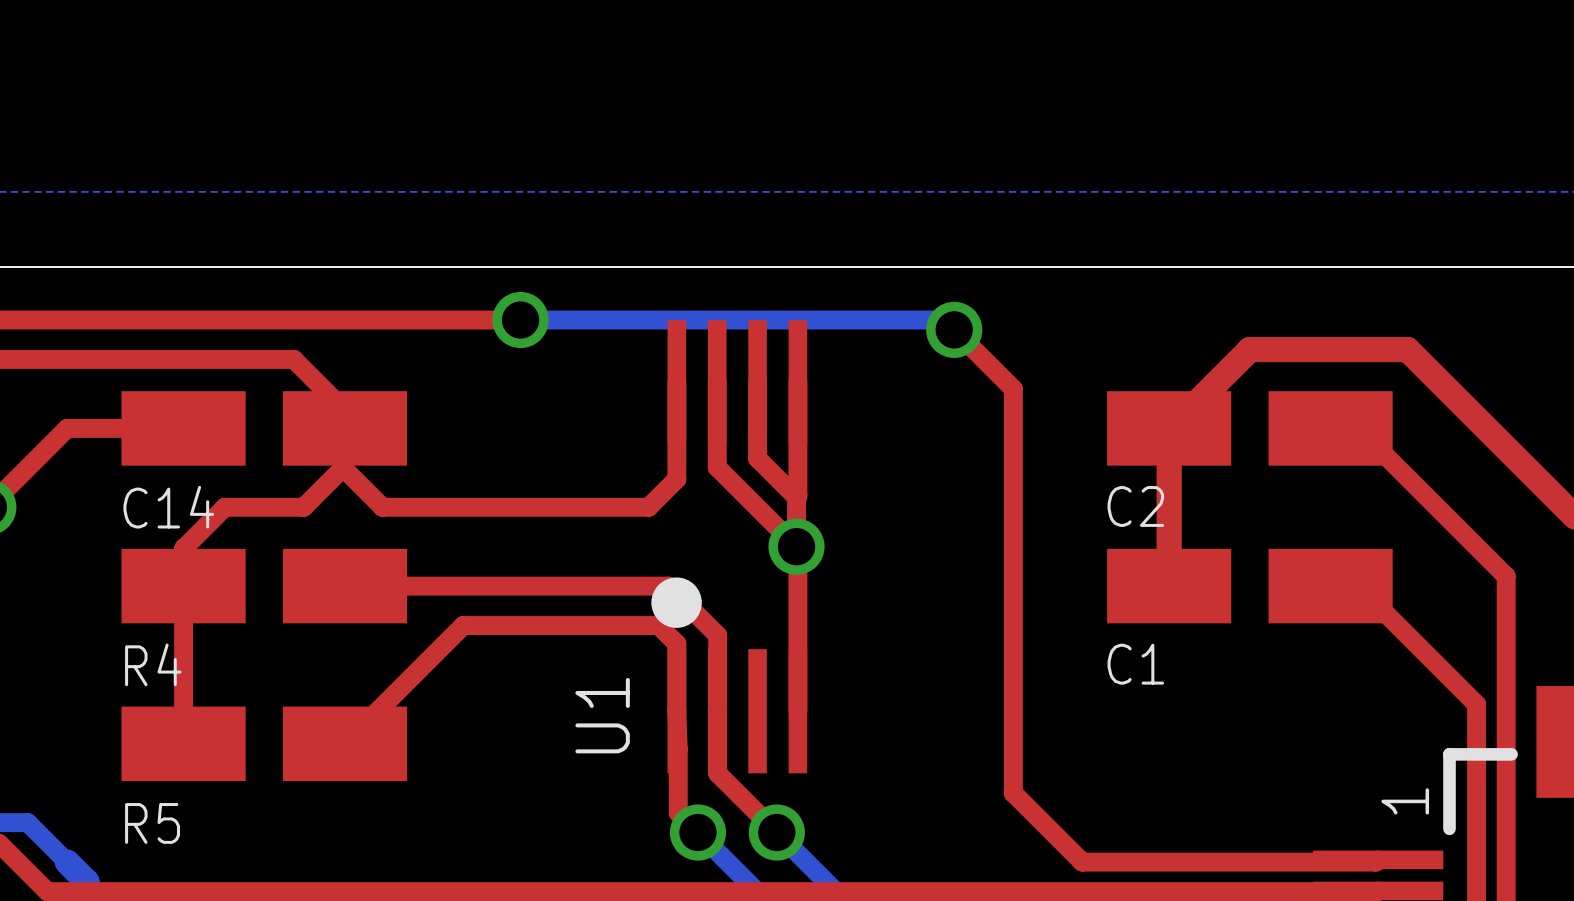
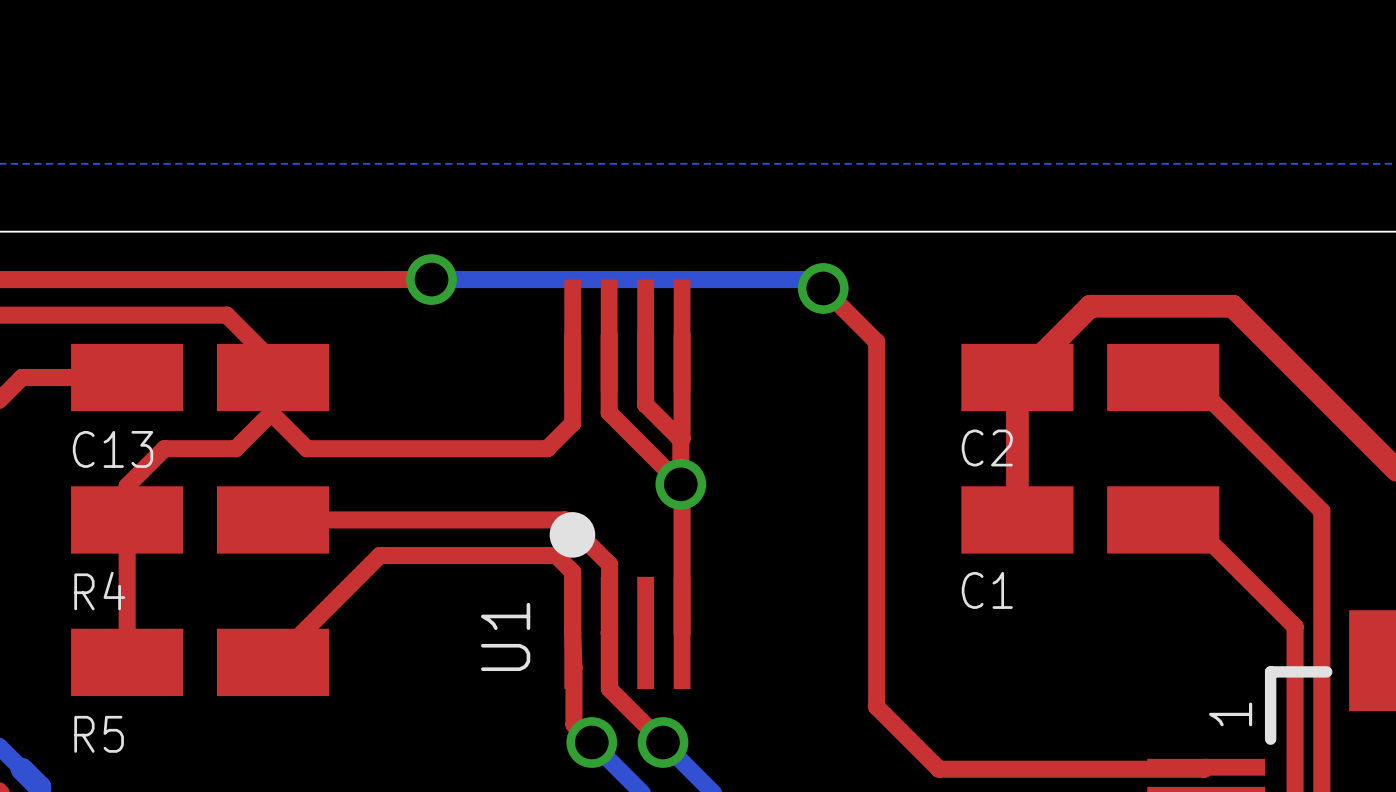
C14 name: C14 (168, 507) -> C13 (113, 449)

